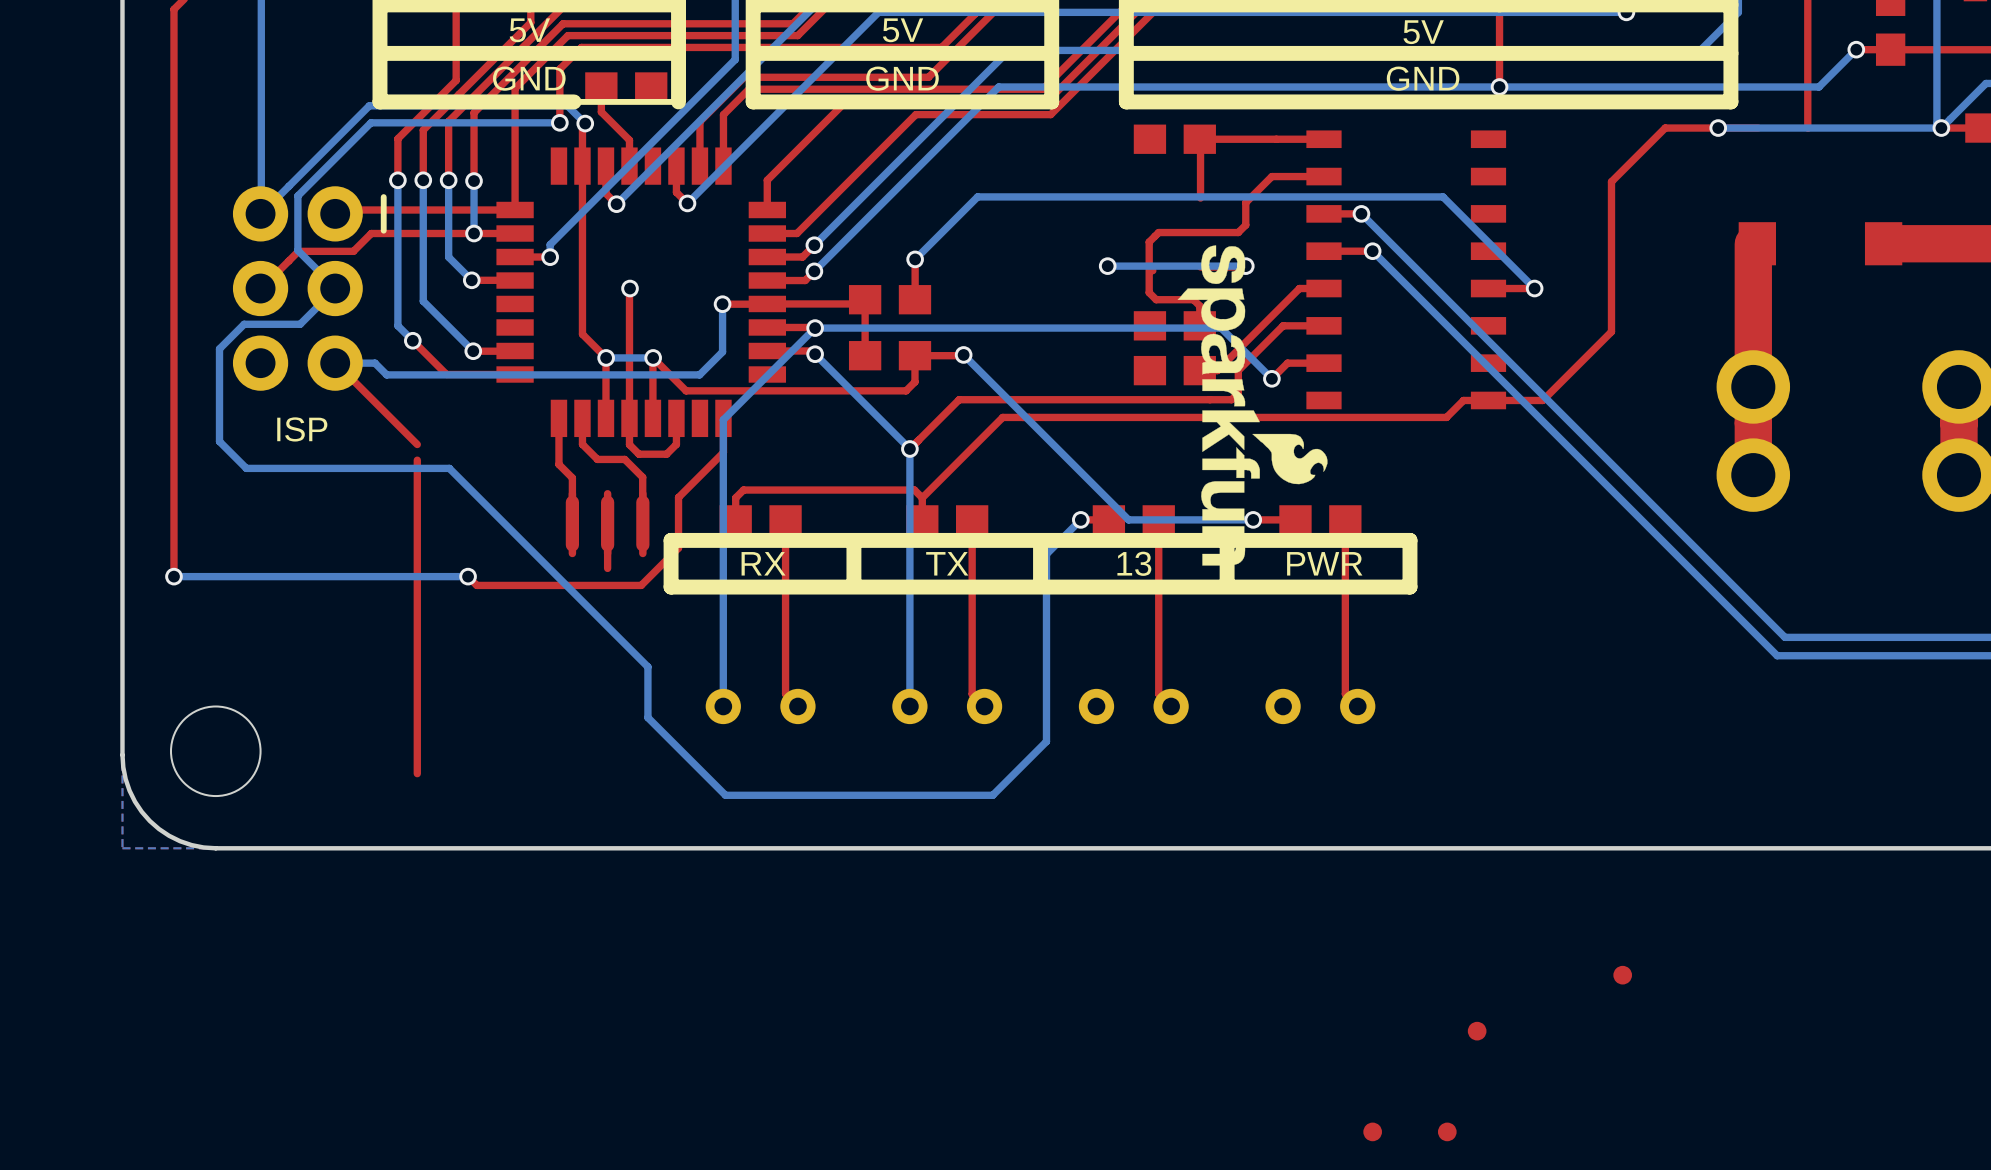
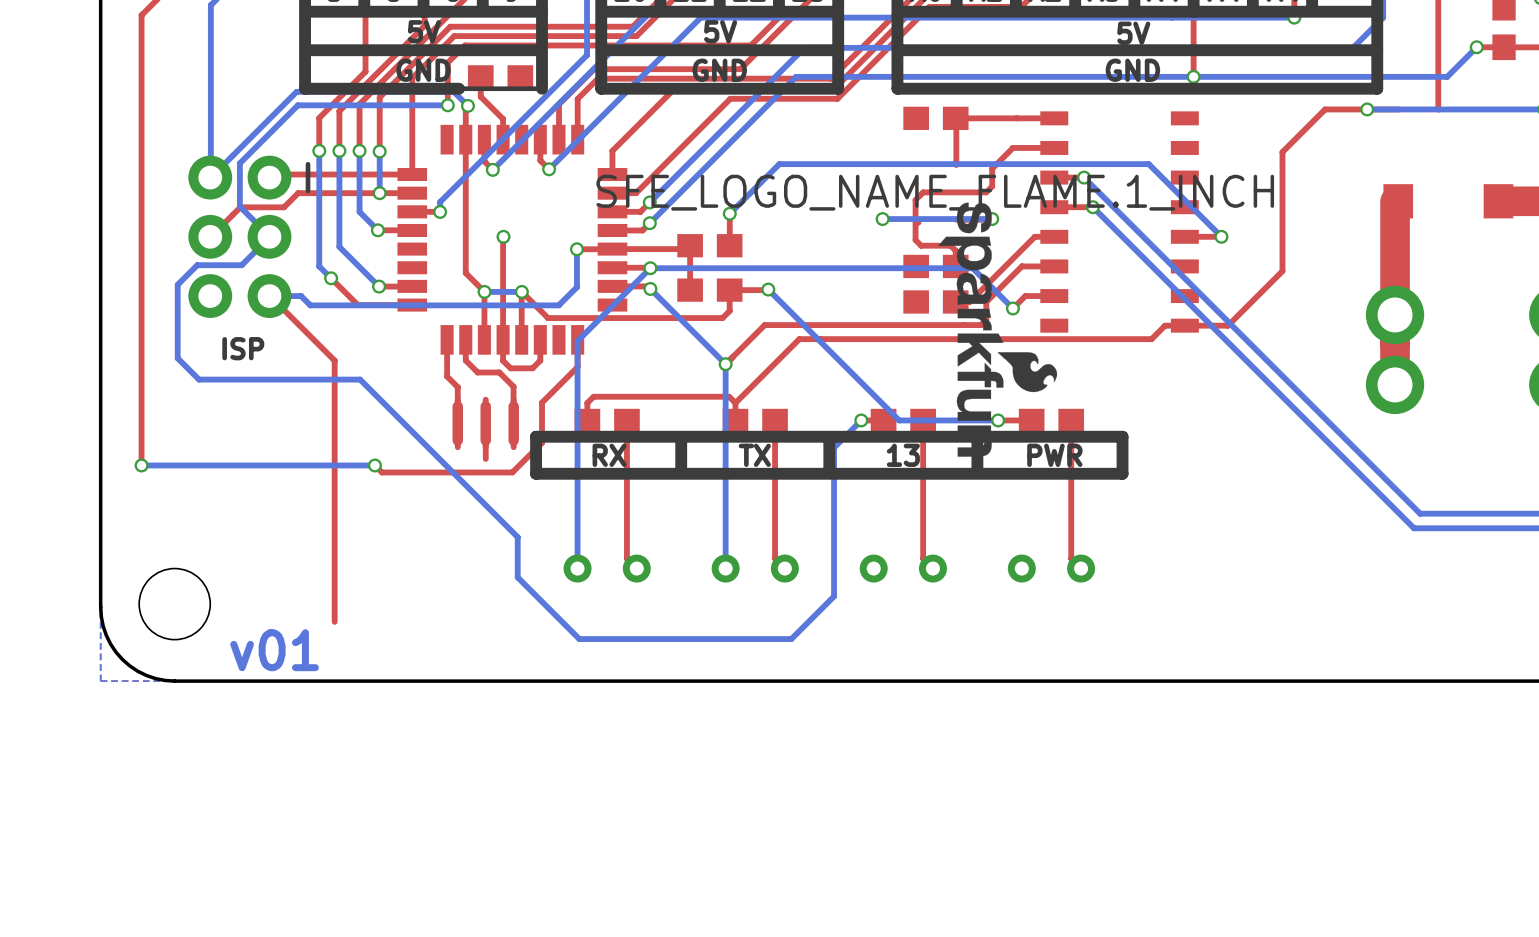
drawing shape: [1177, 245, 1328, 566] -> [596, 174, 1275, 457]
top track: none -> (334, 360) (334, 373)
text: none -> v01 (274, 650)
part: (1622, 975) -> none
part: (1477, 1031) -> none
part: (1372, 1131) -> none
part: (1447, 1131) -> none

